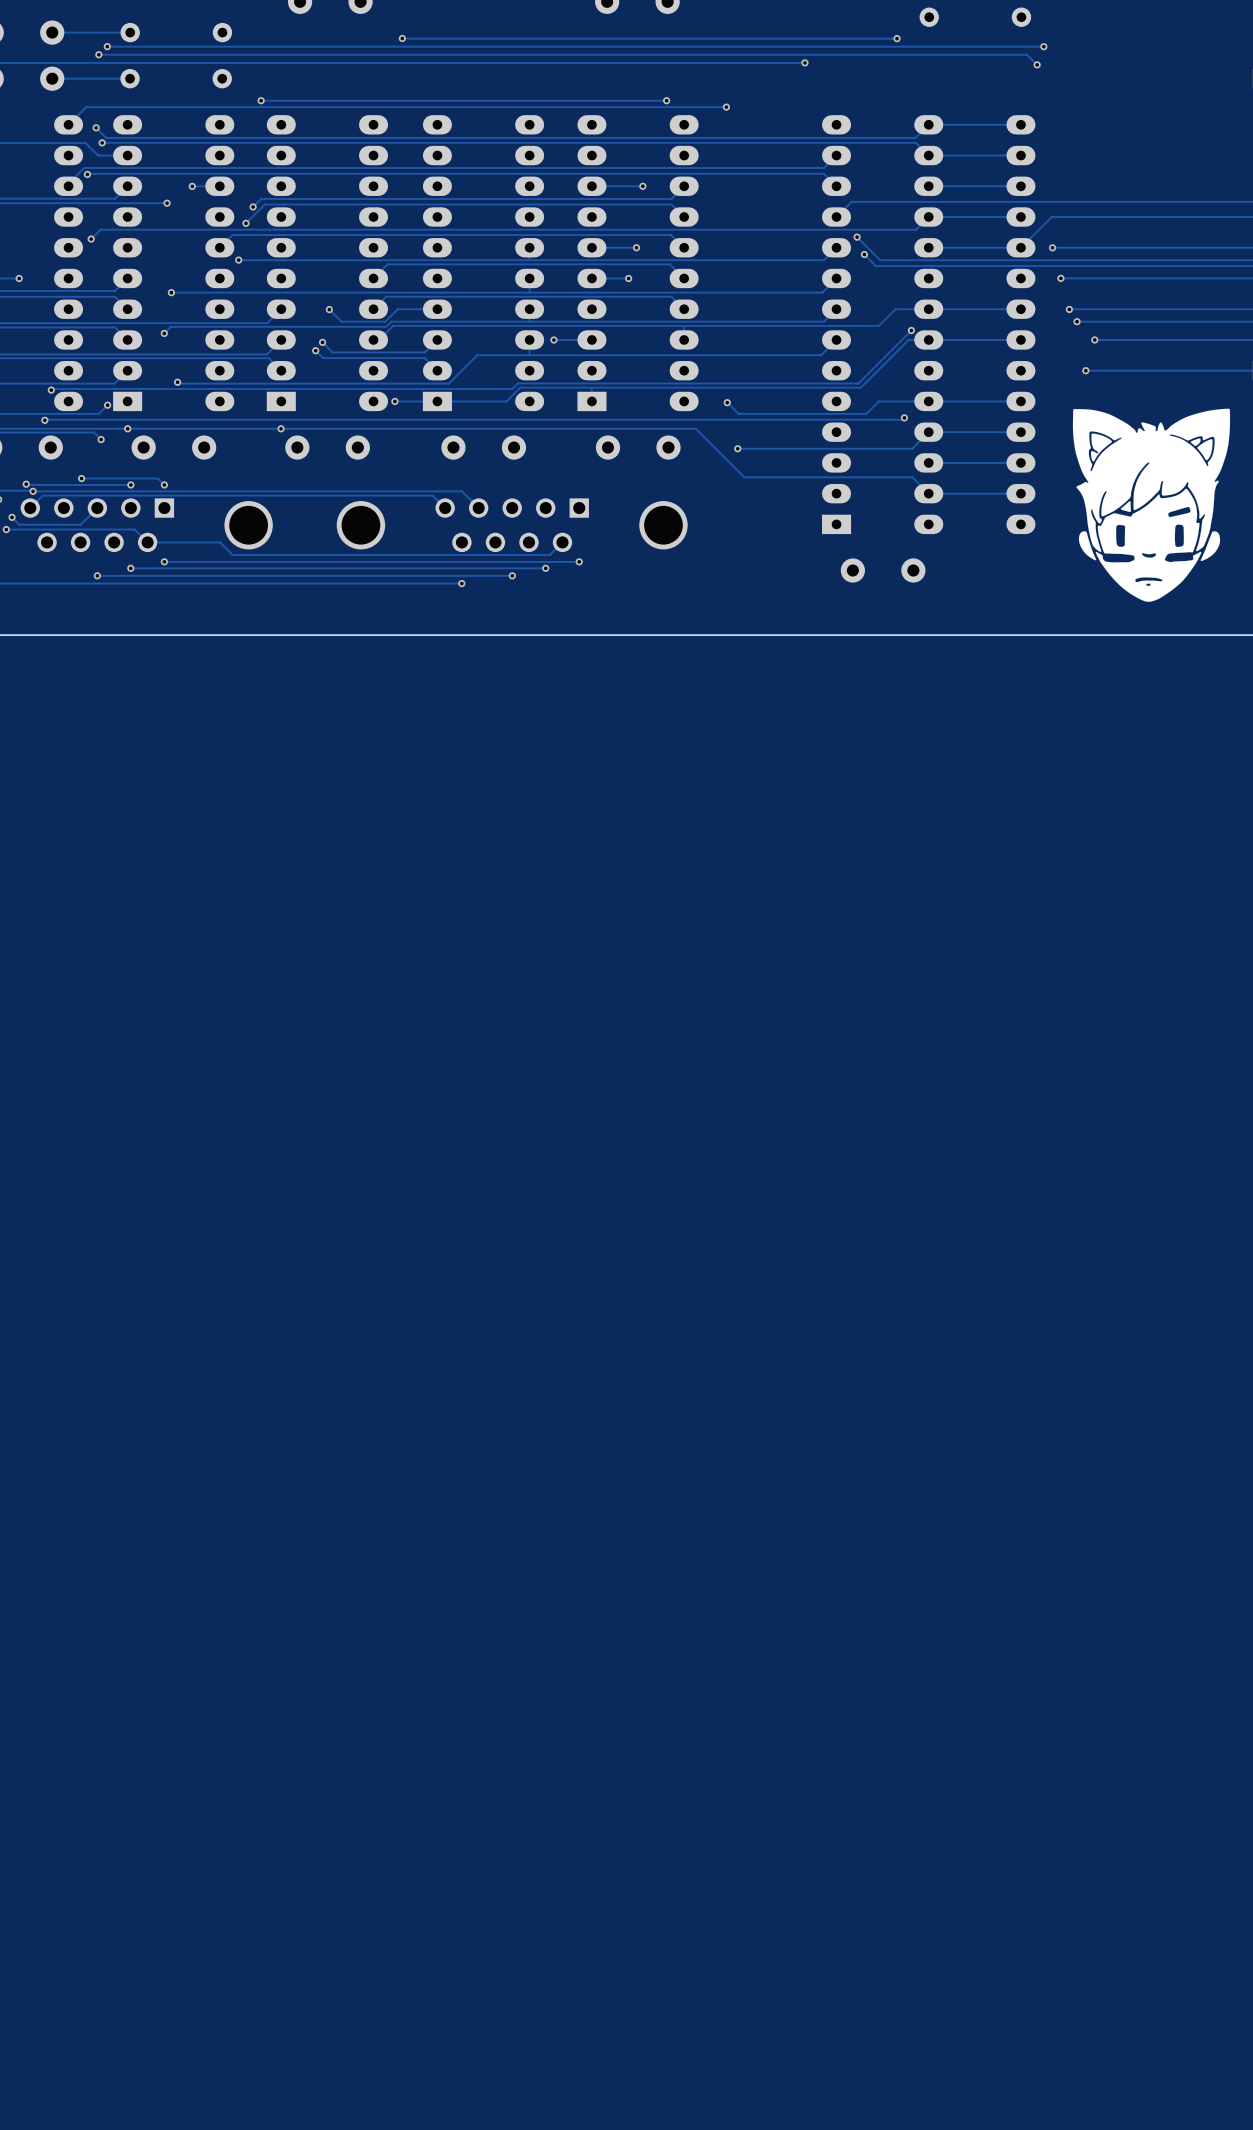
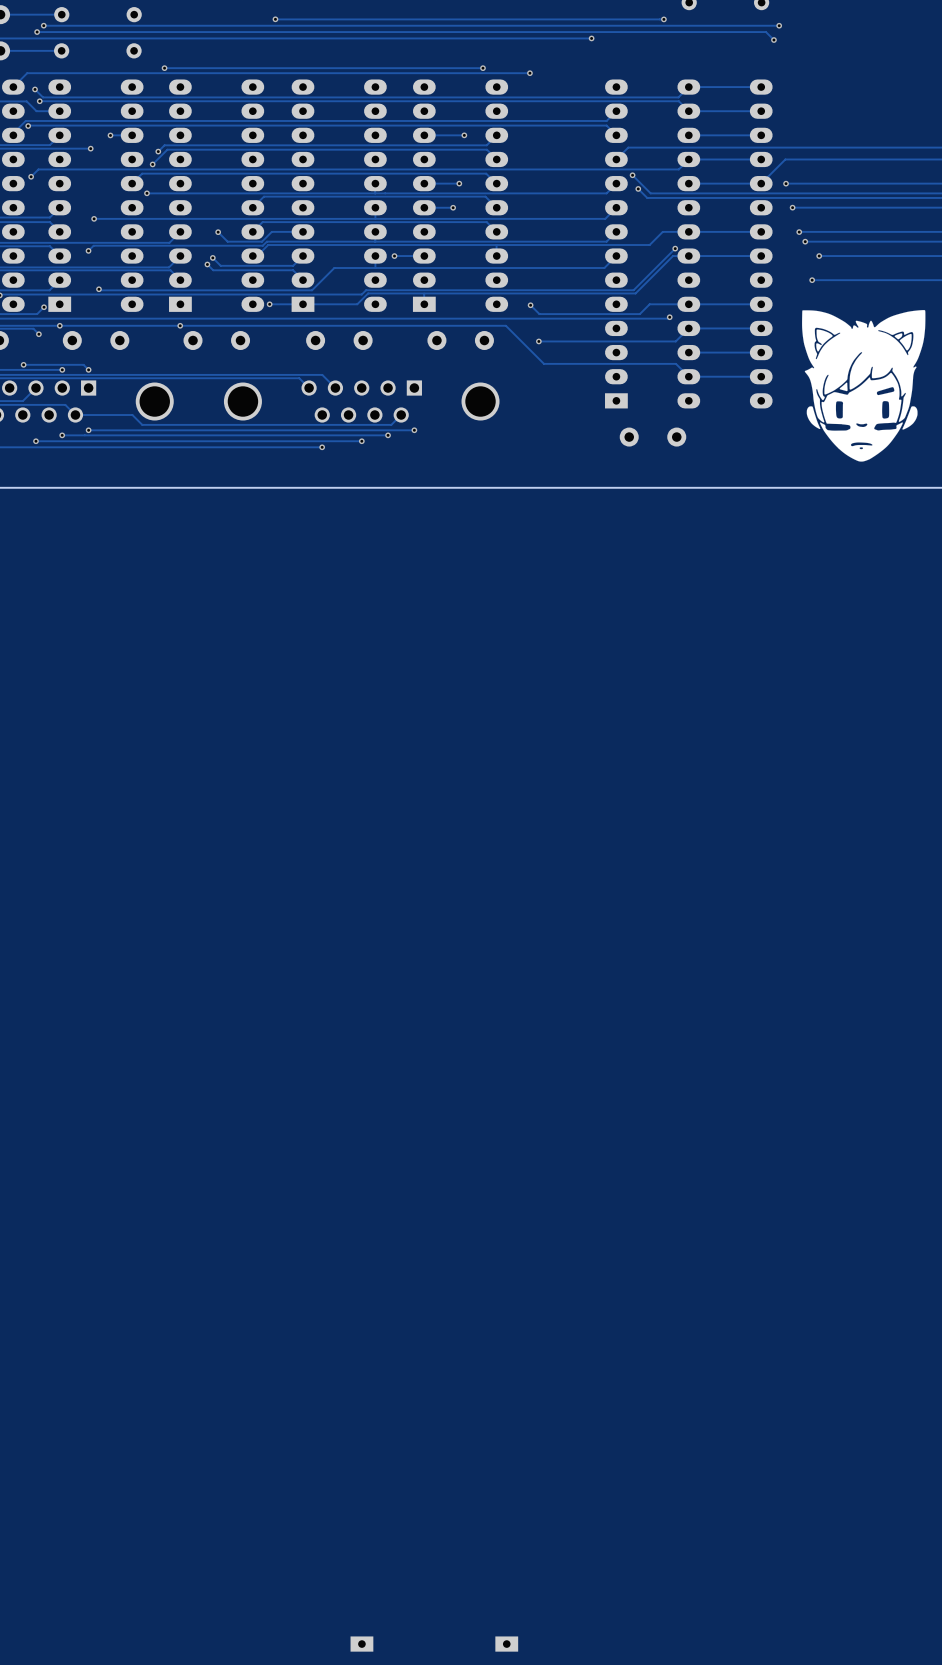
part: none -> (361, 1644)
part: none -> (506, 1644)

